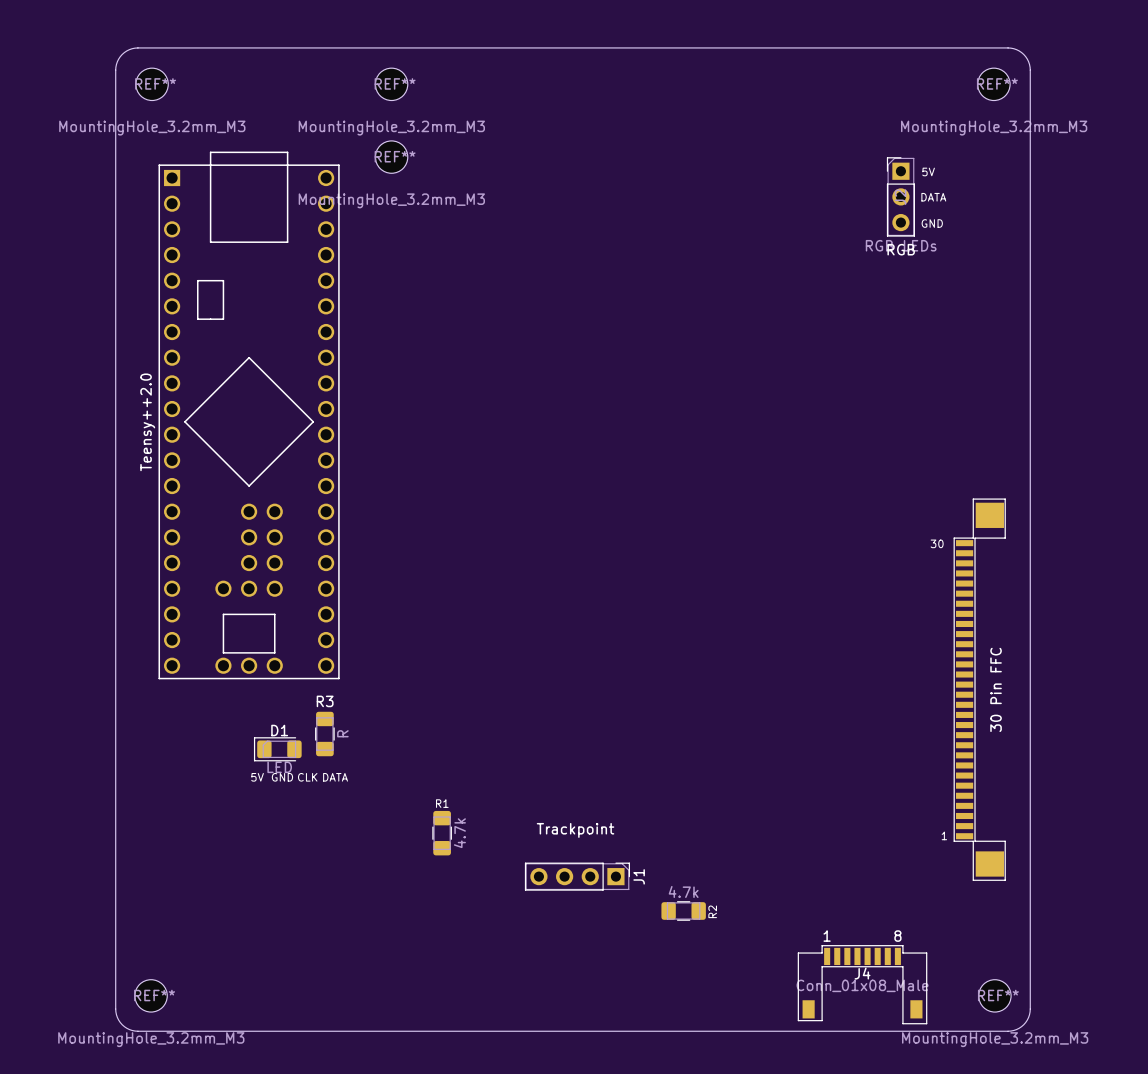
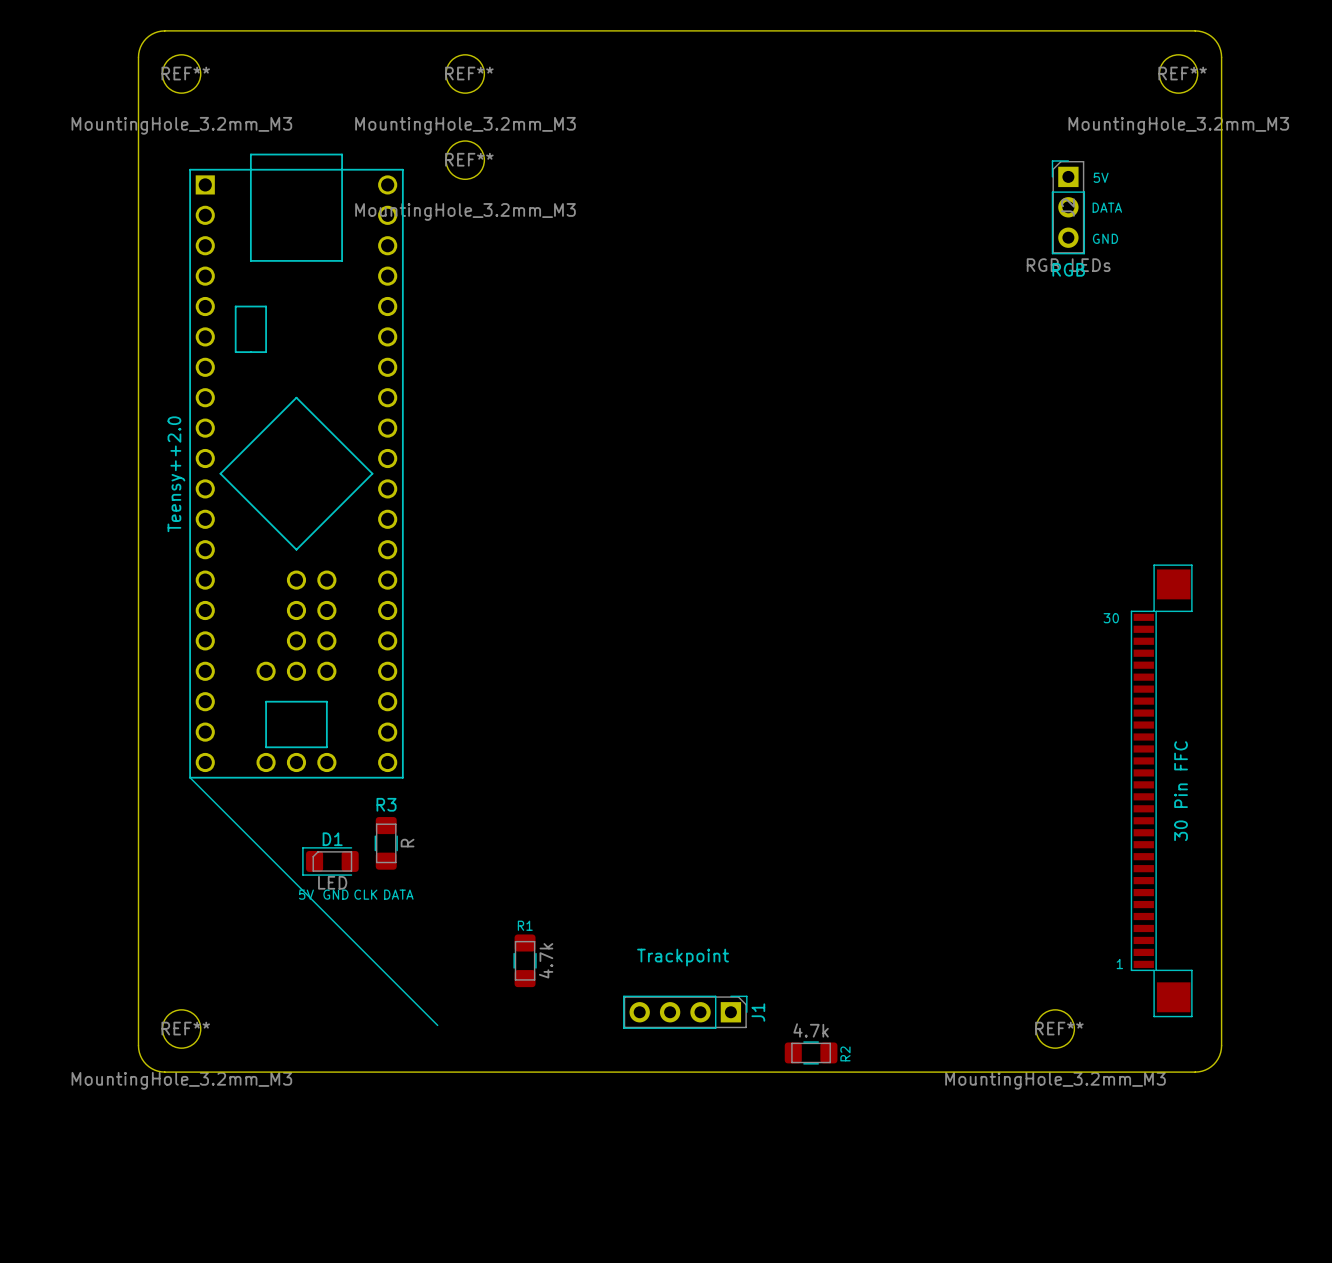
line: none -> (190, 777) (437, 1025)
board edge: (115, 904) (115, 1011) (118, 1020) (124, 1026) (137, 1031) (1010, 1031) (1023, 1024) (1030, 1011) (1030, 904) -> (138, 1045) (140, 1055) (146, 1064) (154, 1070) (164, 1072) (1195, 1072) (1205, 1070) (1213, 1064) (1219, 1055) (1221, 1045)
J4: Conn_01x08_Male (862, 984) -> none
REF** position: (151, 995) -> (181, 1029)
REF** position: (994, 995) -> (1055, 1029)

